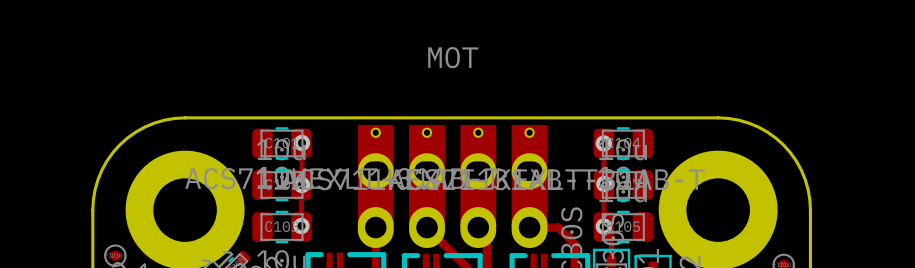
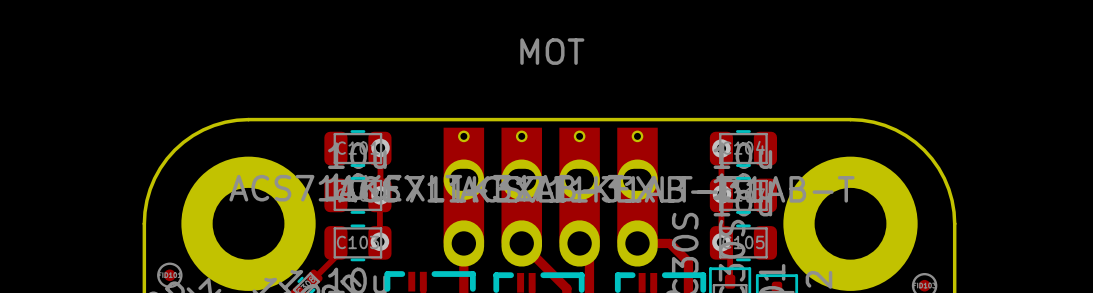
top track: none -> (335, 242) (335, 256) (314, 277)

